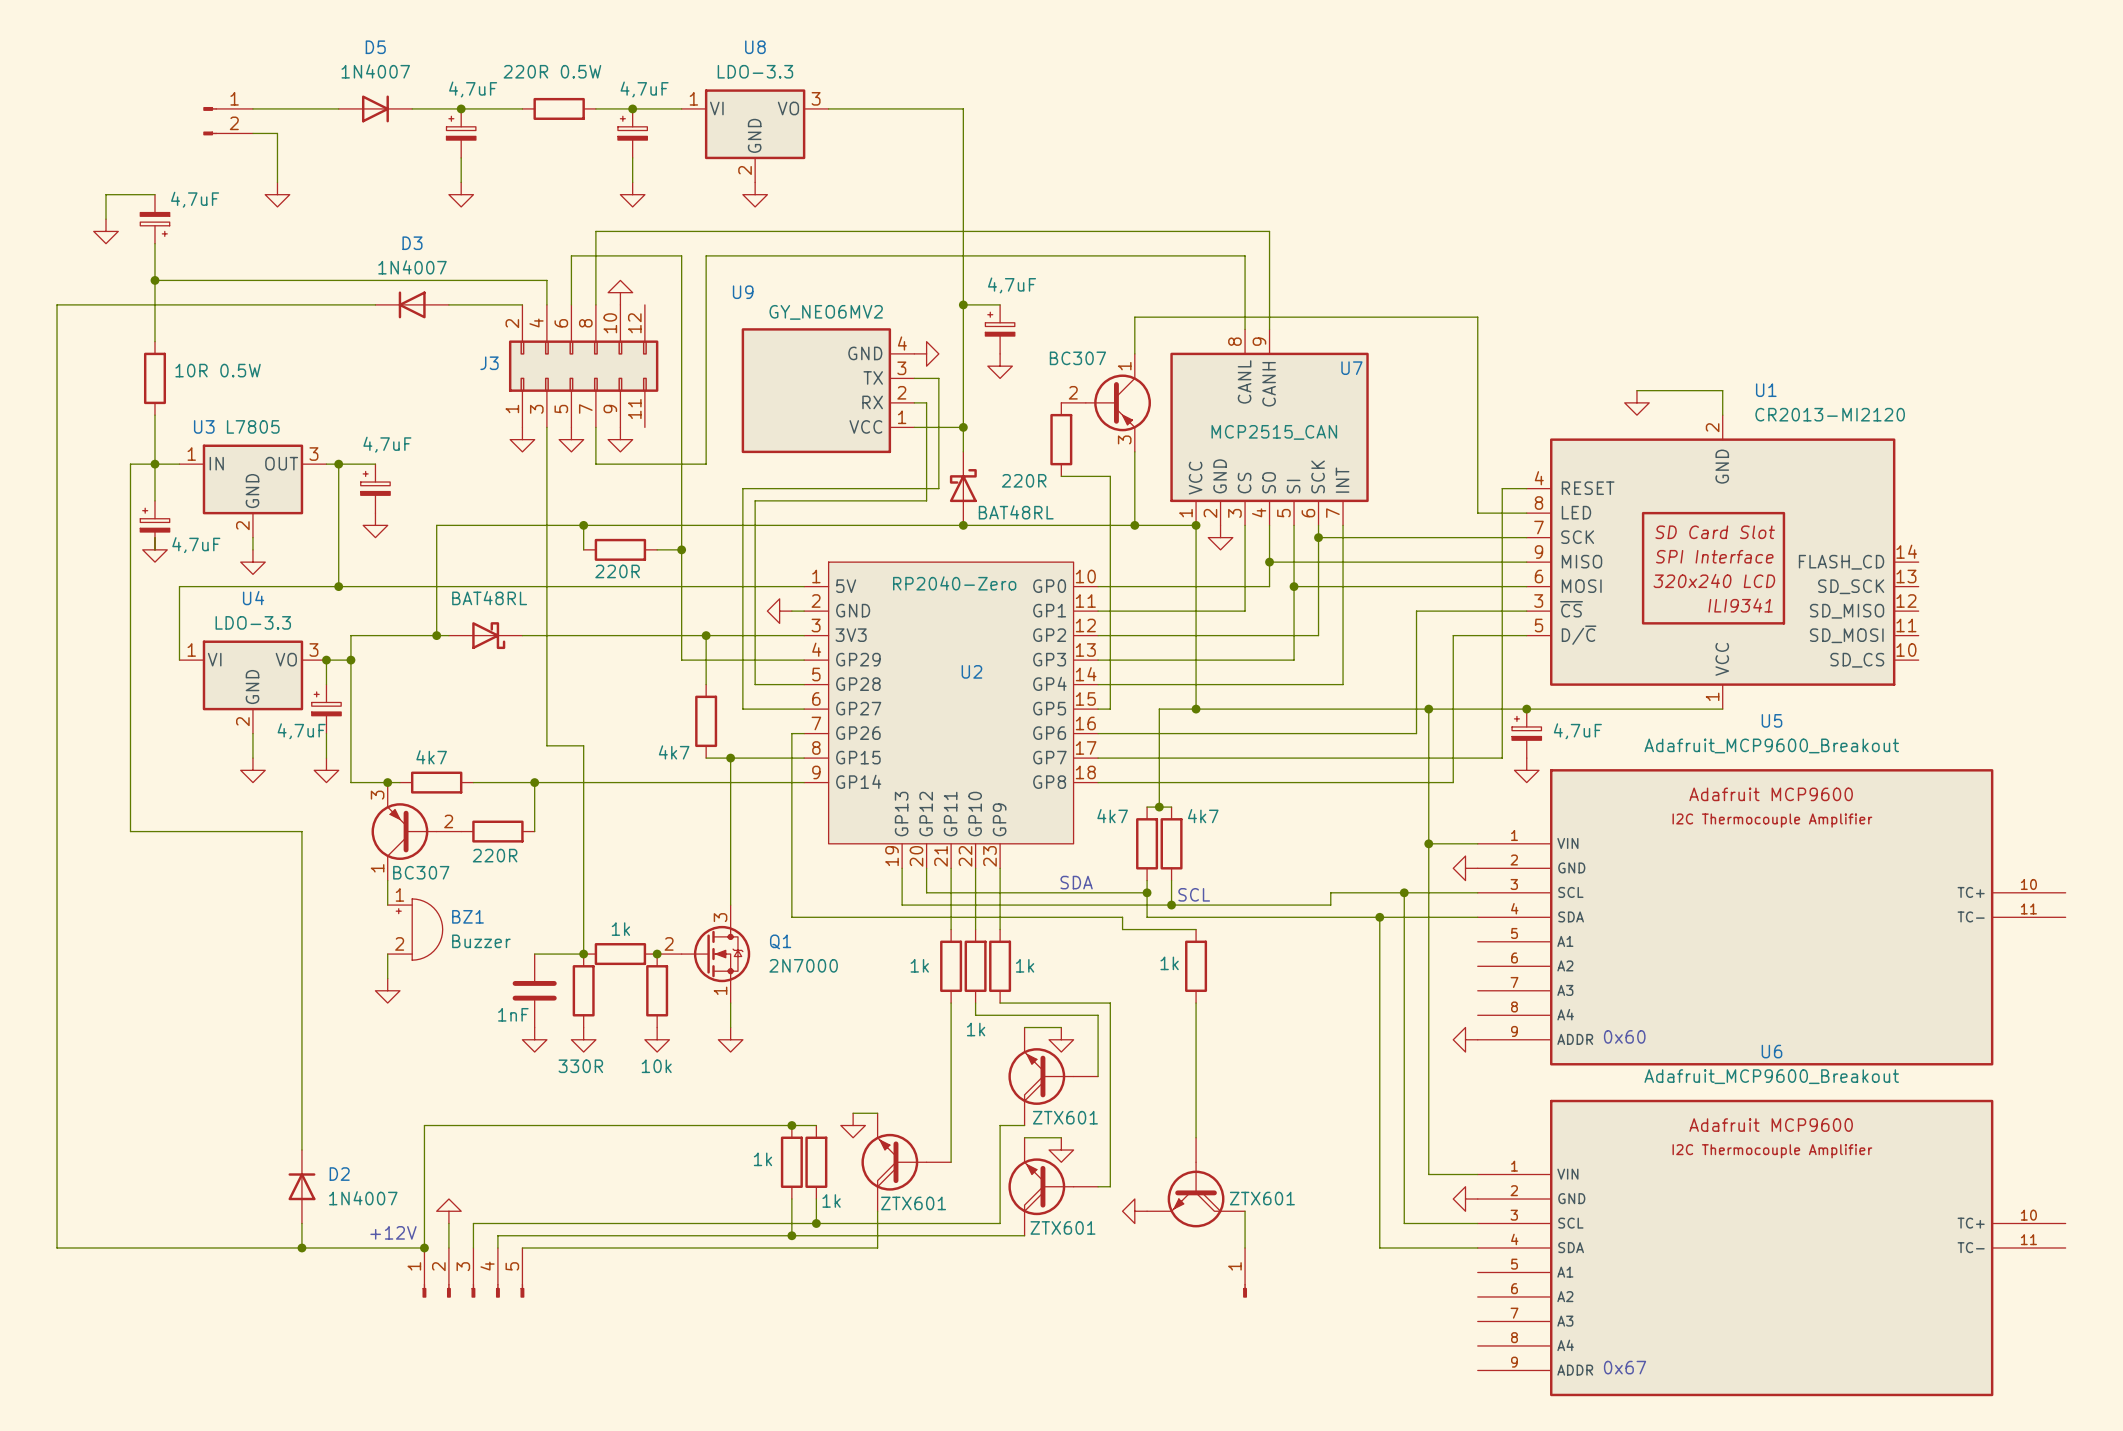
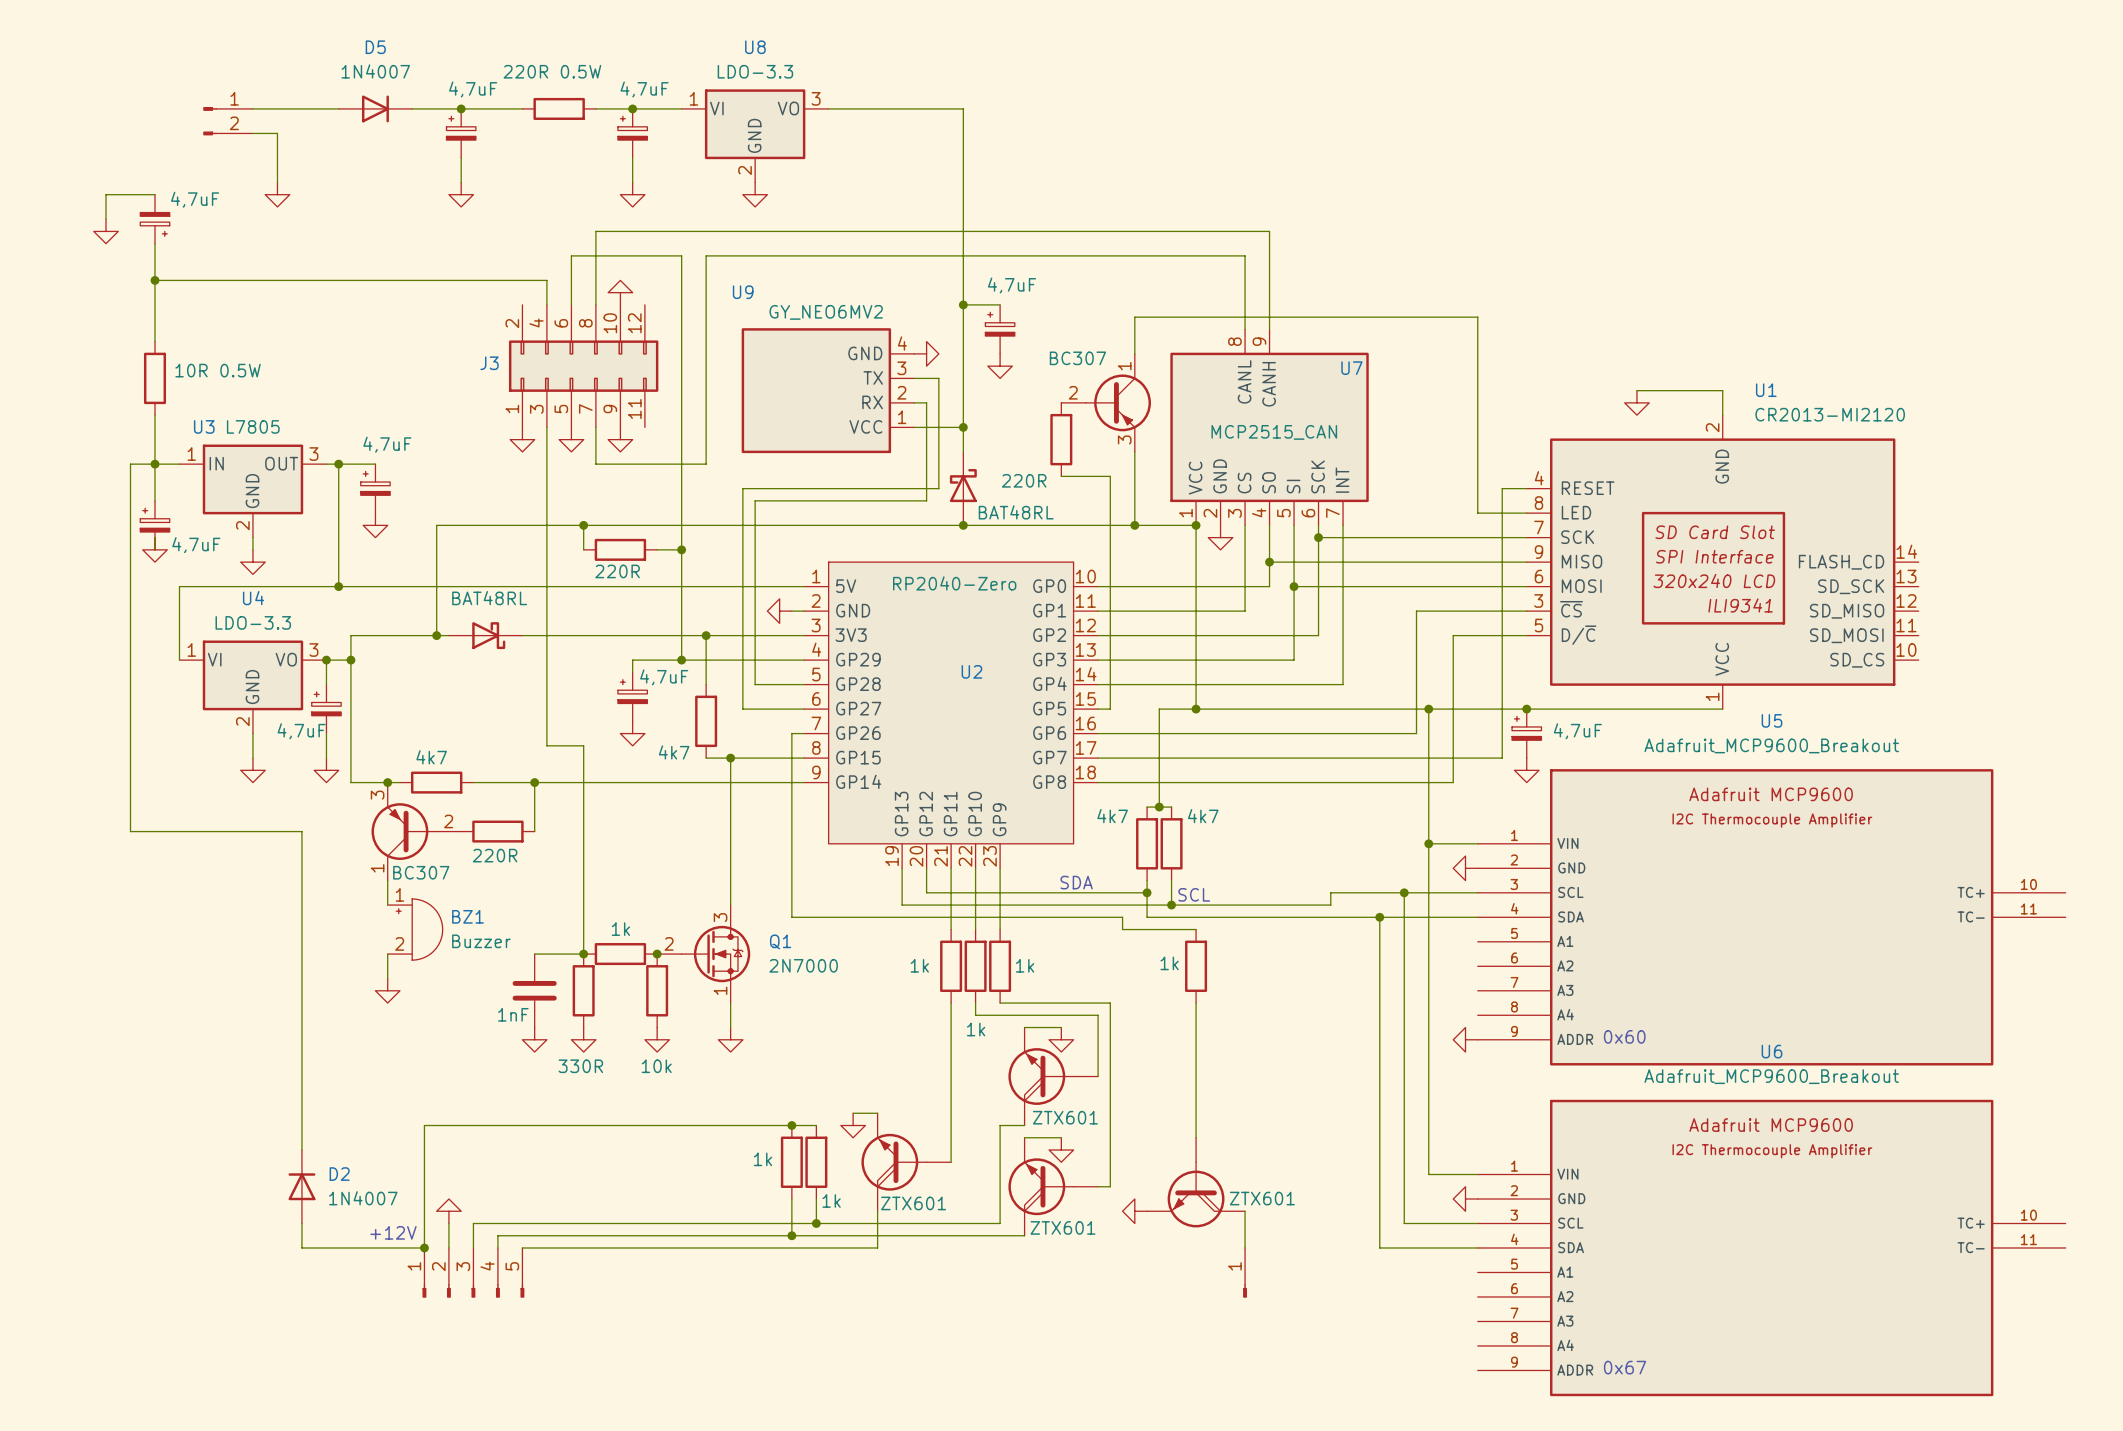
wire: (375, 304) (57, 304) (57, 1247) (301, 1247) -> none
D3: 1N4007 (412, 304) -> none
wire: (448, 304) (522, 304) -> none
wire: none -> (681, 660) (632, 660) (632, 672)
junction: none -> (681, 660)
part: none -> 4,7uF (632, 696)
power symbol: none -> (632, 733)
junction: (301, 1247) -> none

